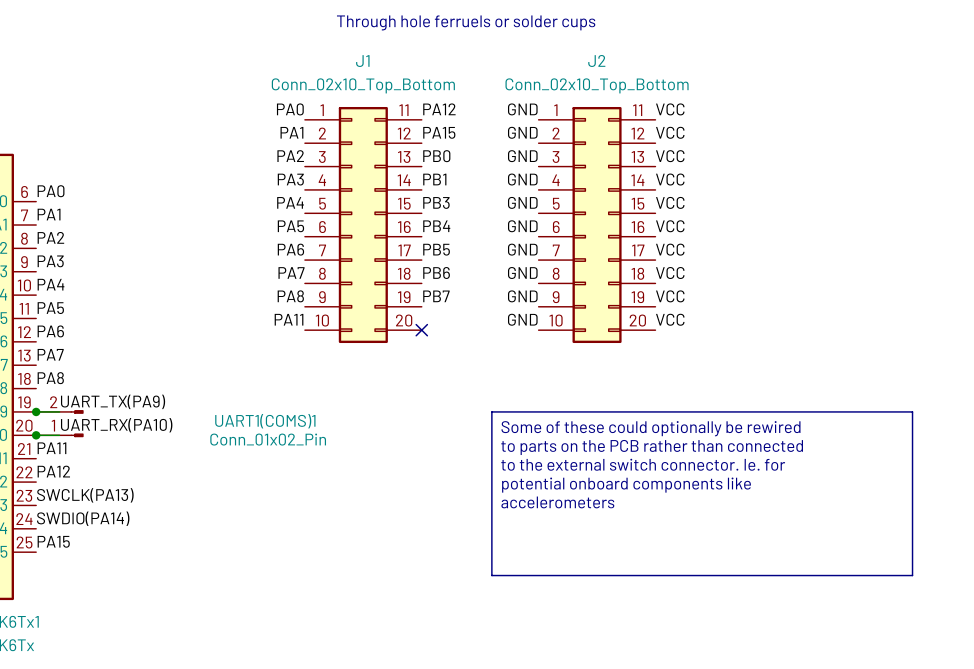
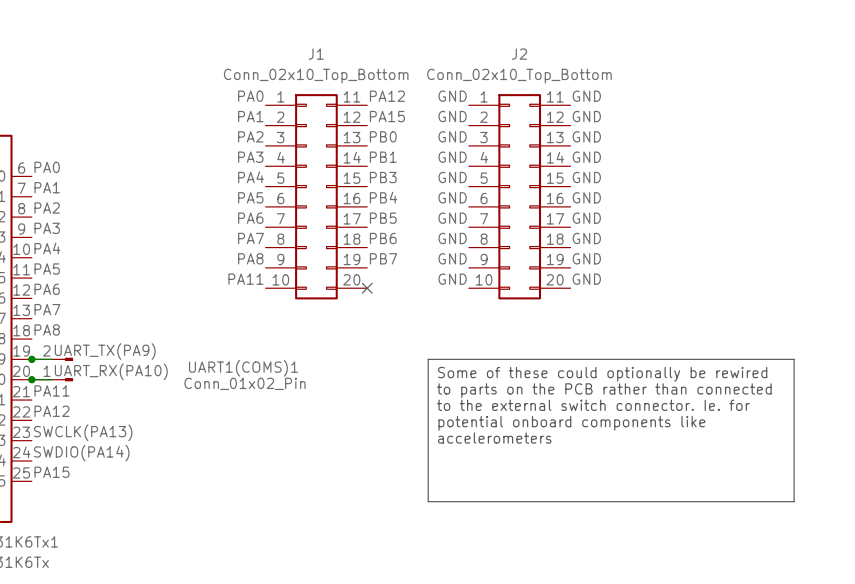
text: Through hole ferruels or solder cups (466, 22) -> none
label: VCC (670, 109) -> GND (586, 96)
label: VCC (670, 132) -> GND (586, 116)
label: VCC (670, 156) -> GND (586, 136)
label: VCC (670, 179) -> GND (586, 157)
label: VCC (670, 202) -> GND (586, 177)
label: VCC (670, 226) -> GND (586, 197)
label: VCC (670, 249) -> GND (586, 218)
label: VCC (670, 273) -> GND (586, 238)
label: VCC (670, 296) -> GND (586, 258)
label: VCC (670, 319) -> GND (586, 279)

